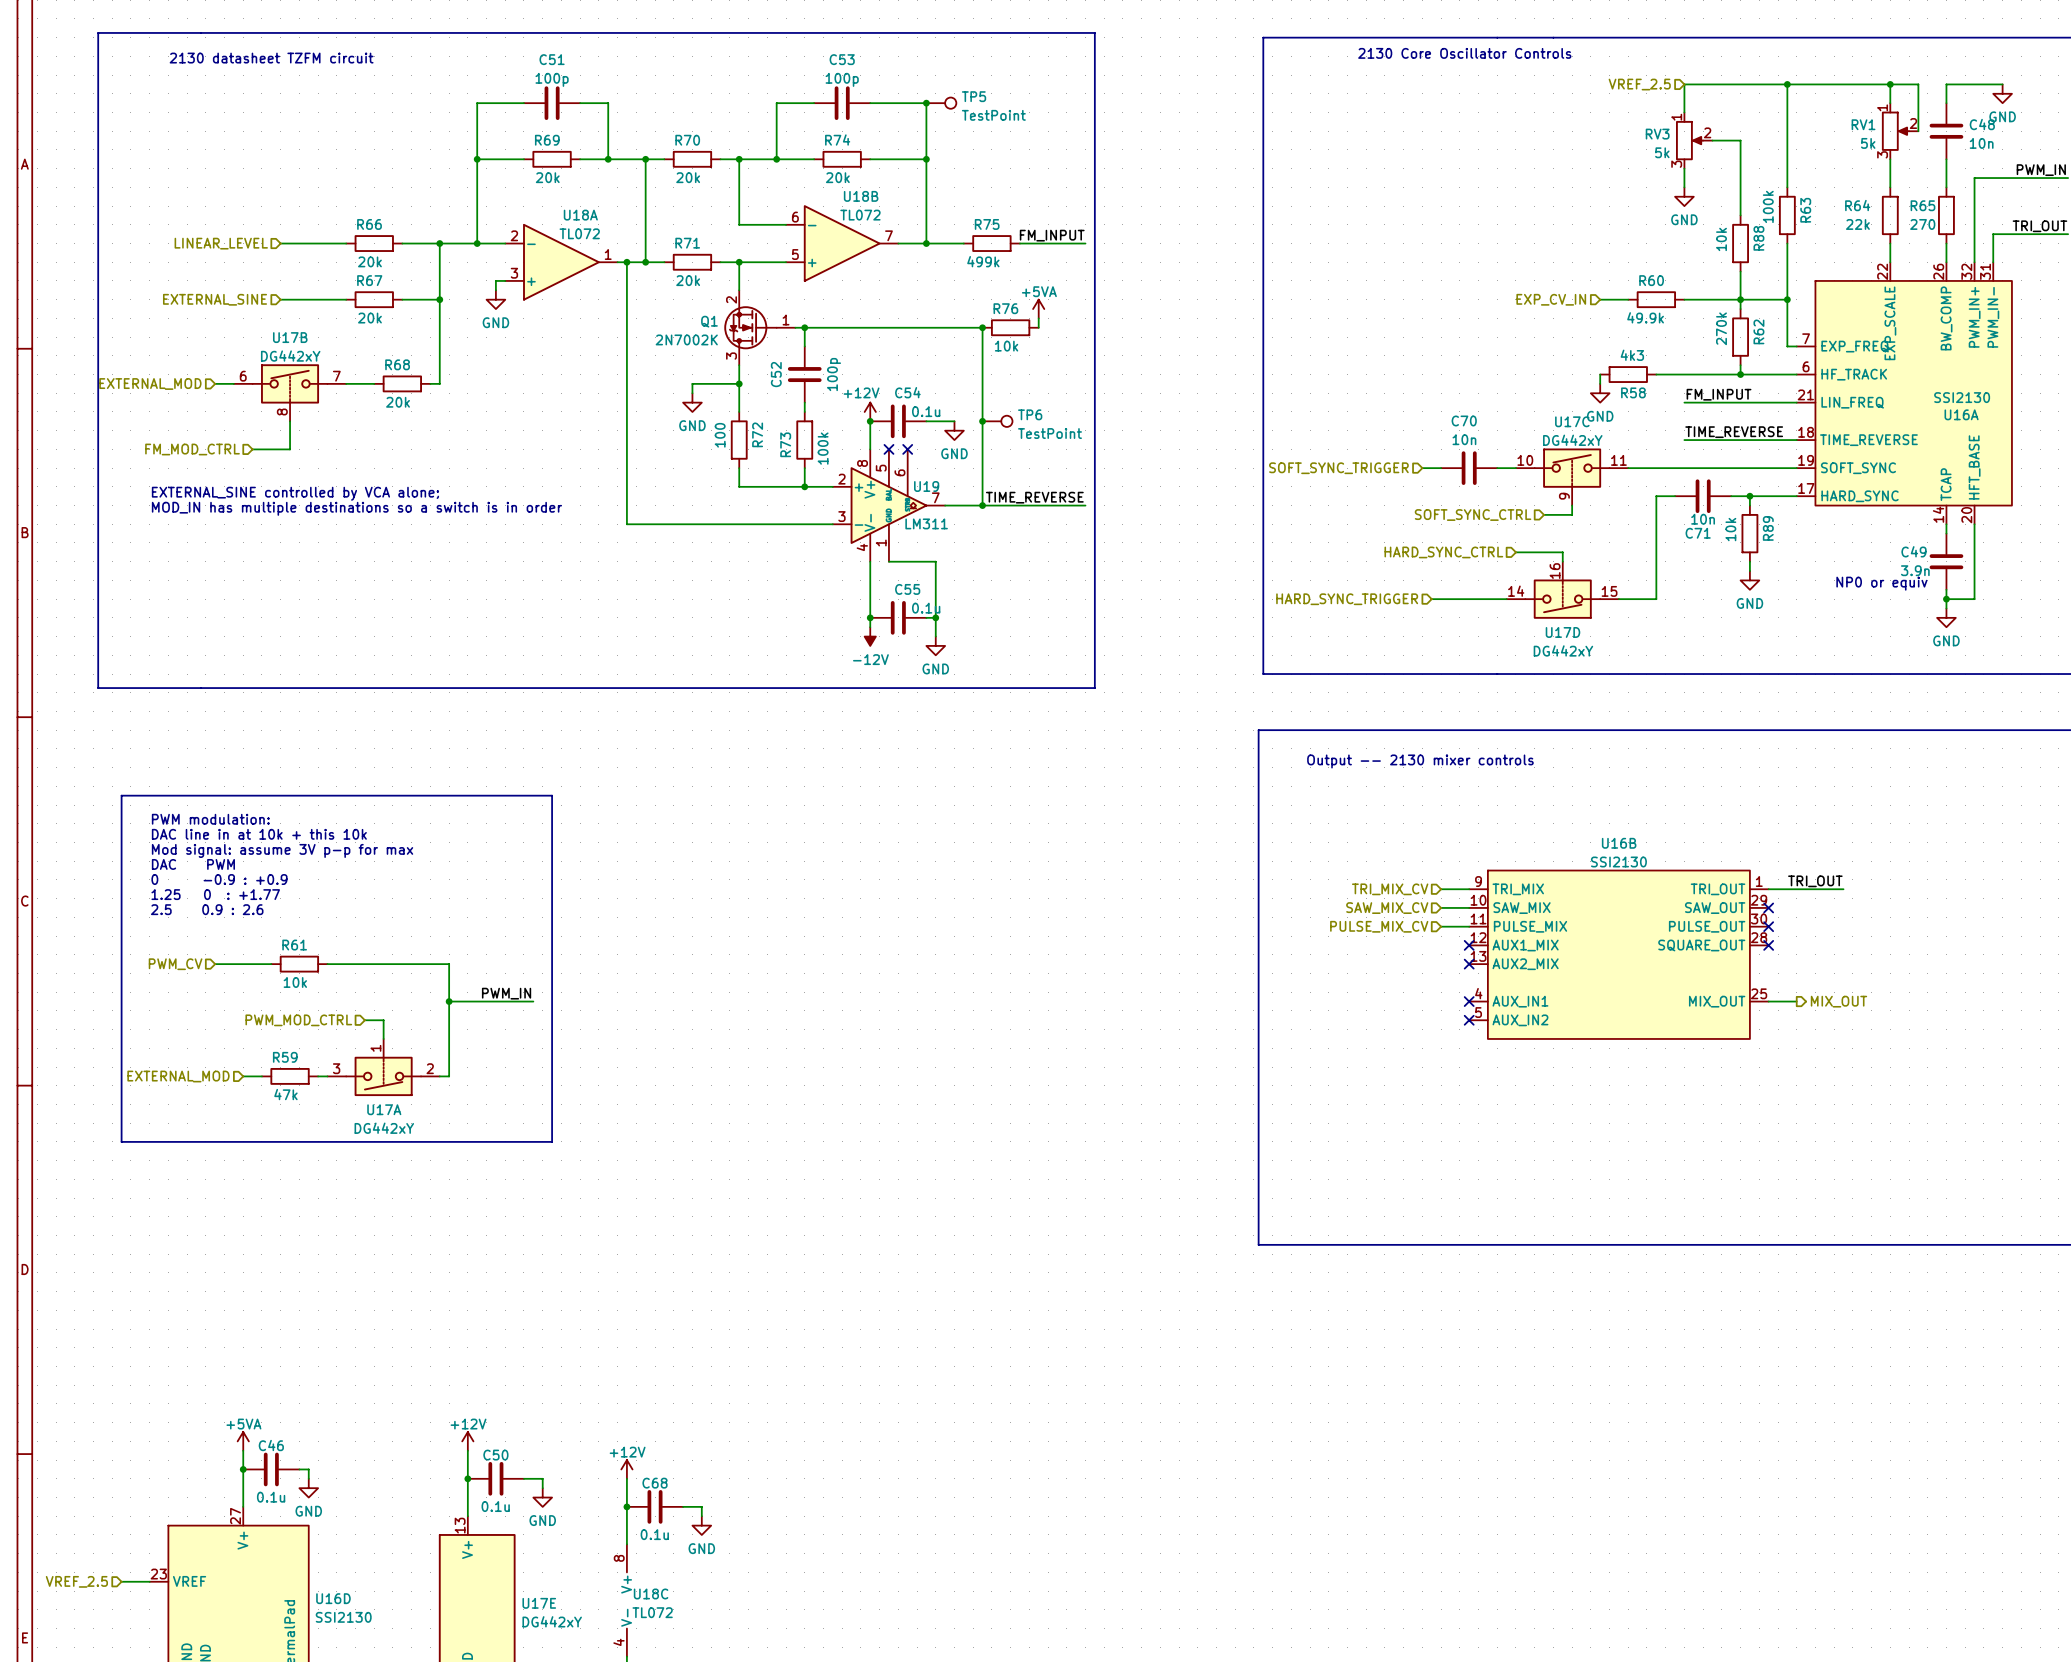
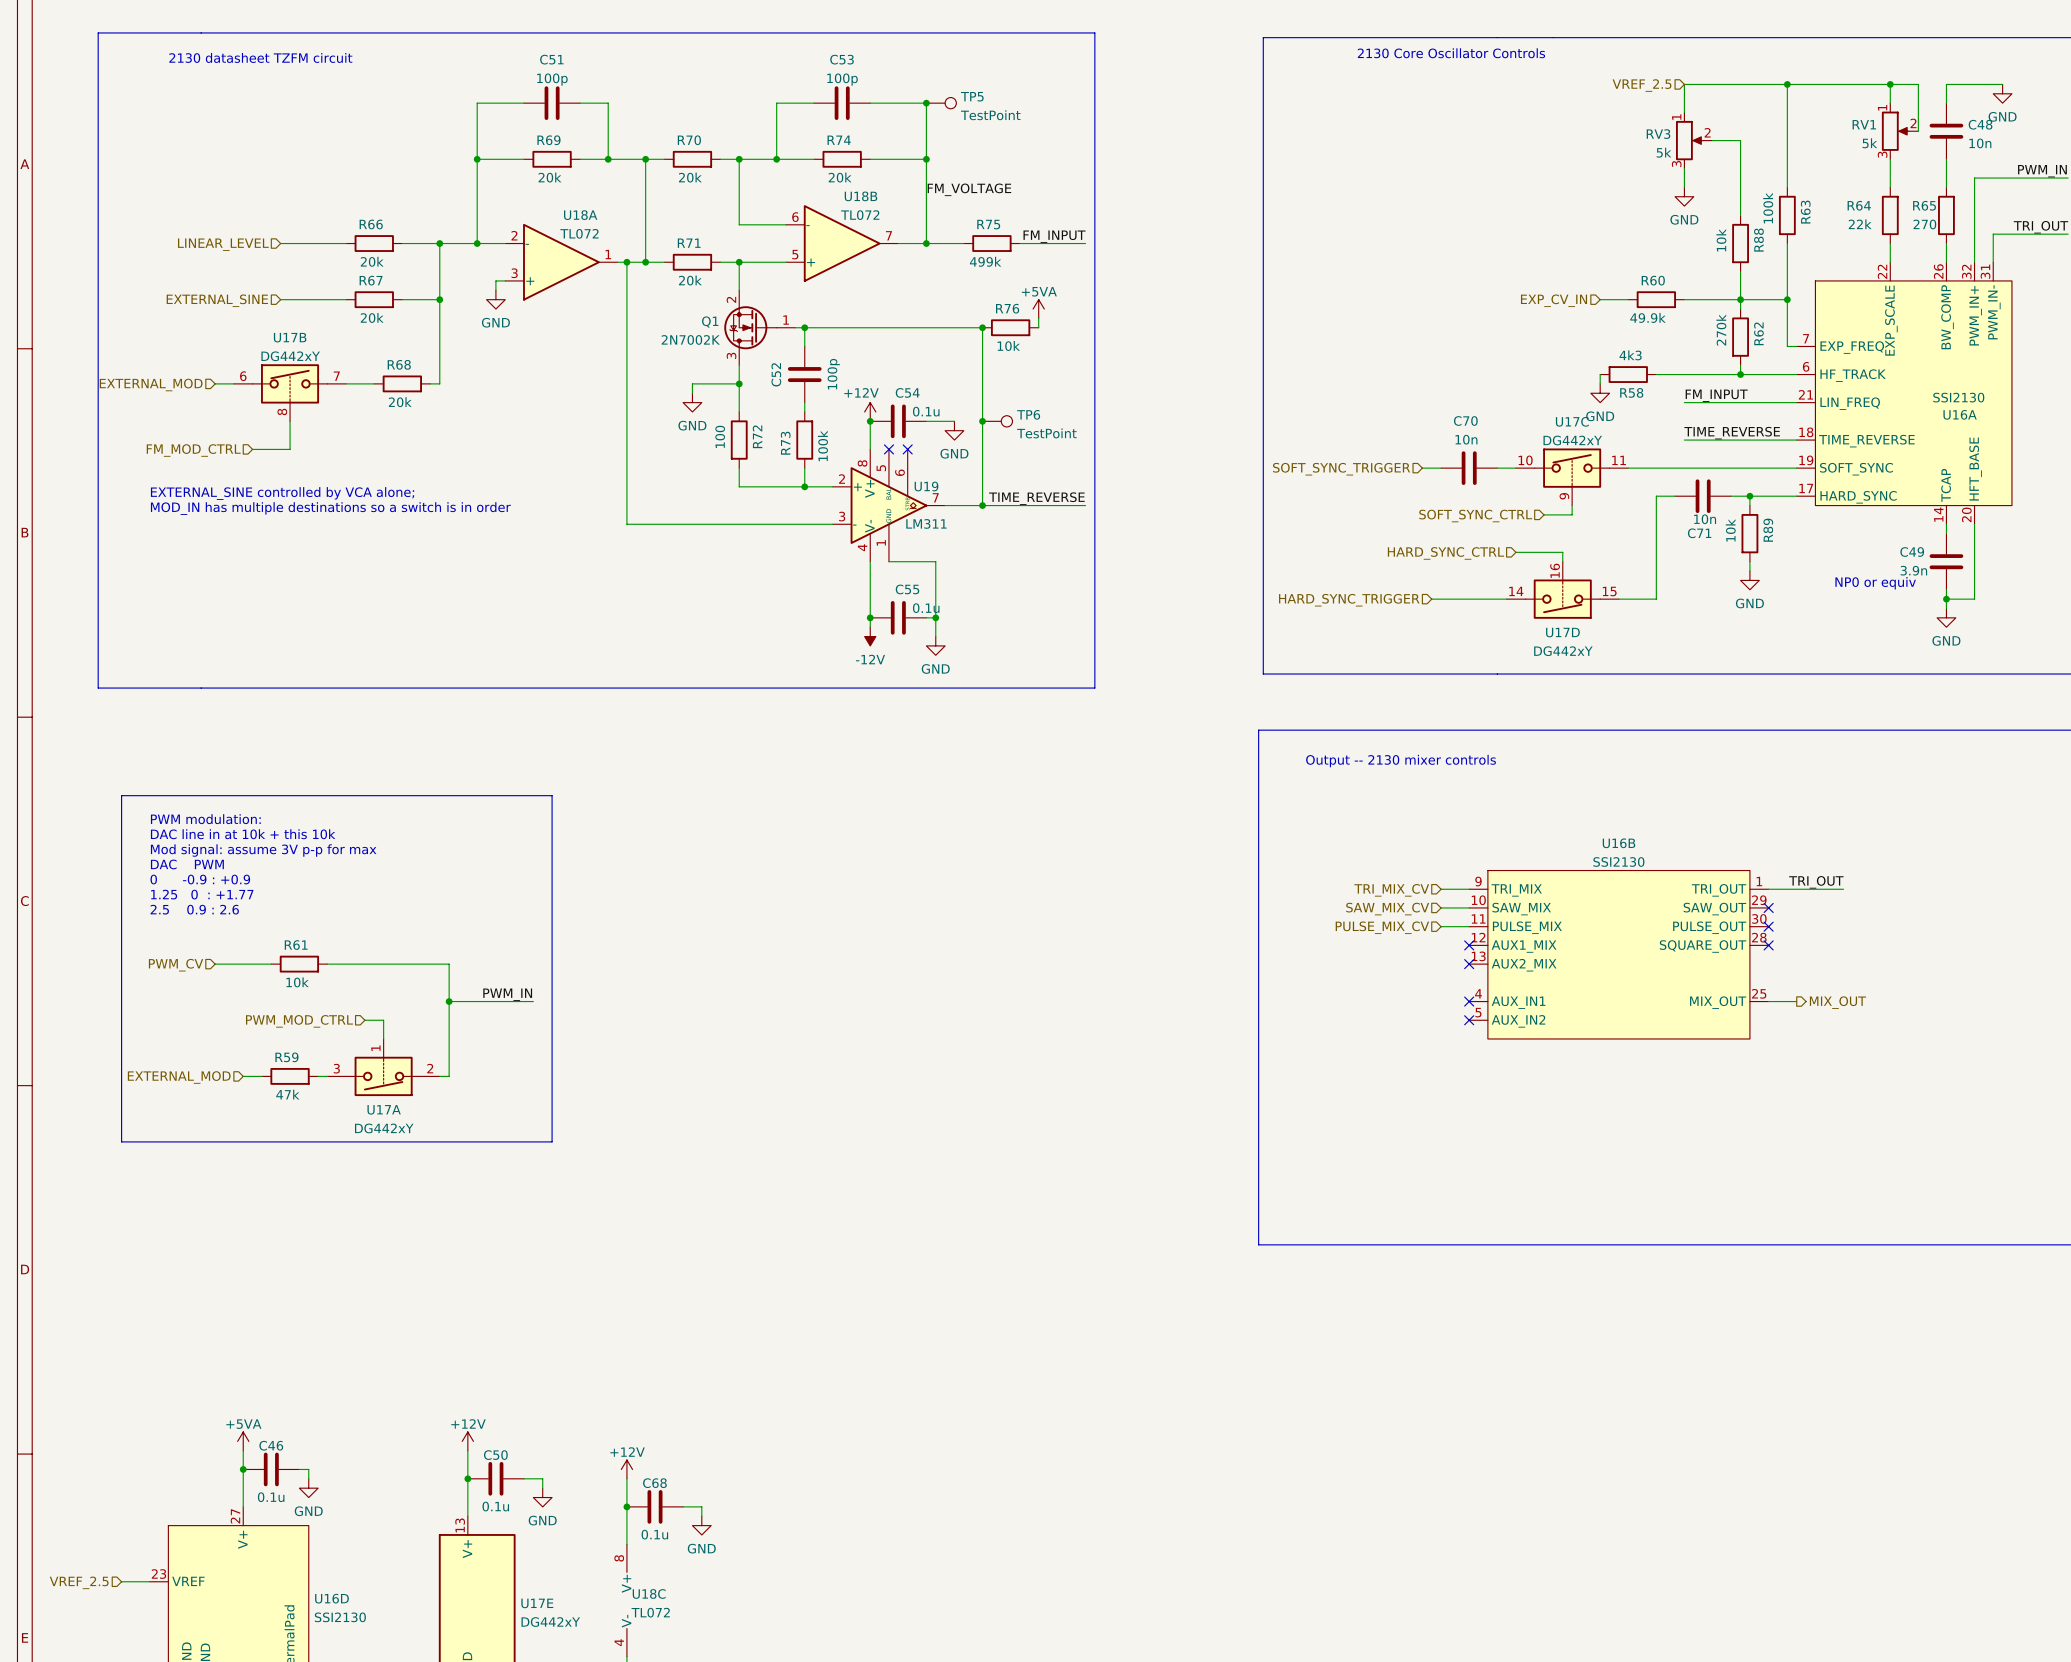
label: none -> FM_VOLTAGE (969, 189)

